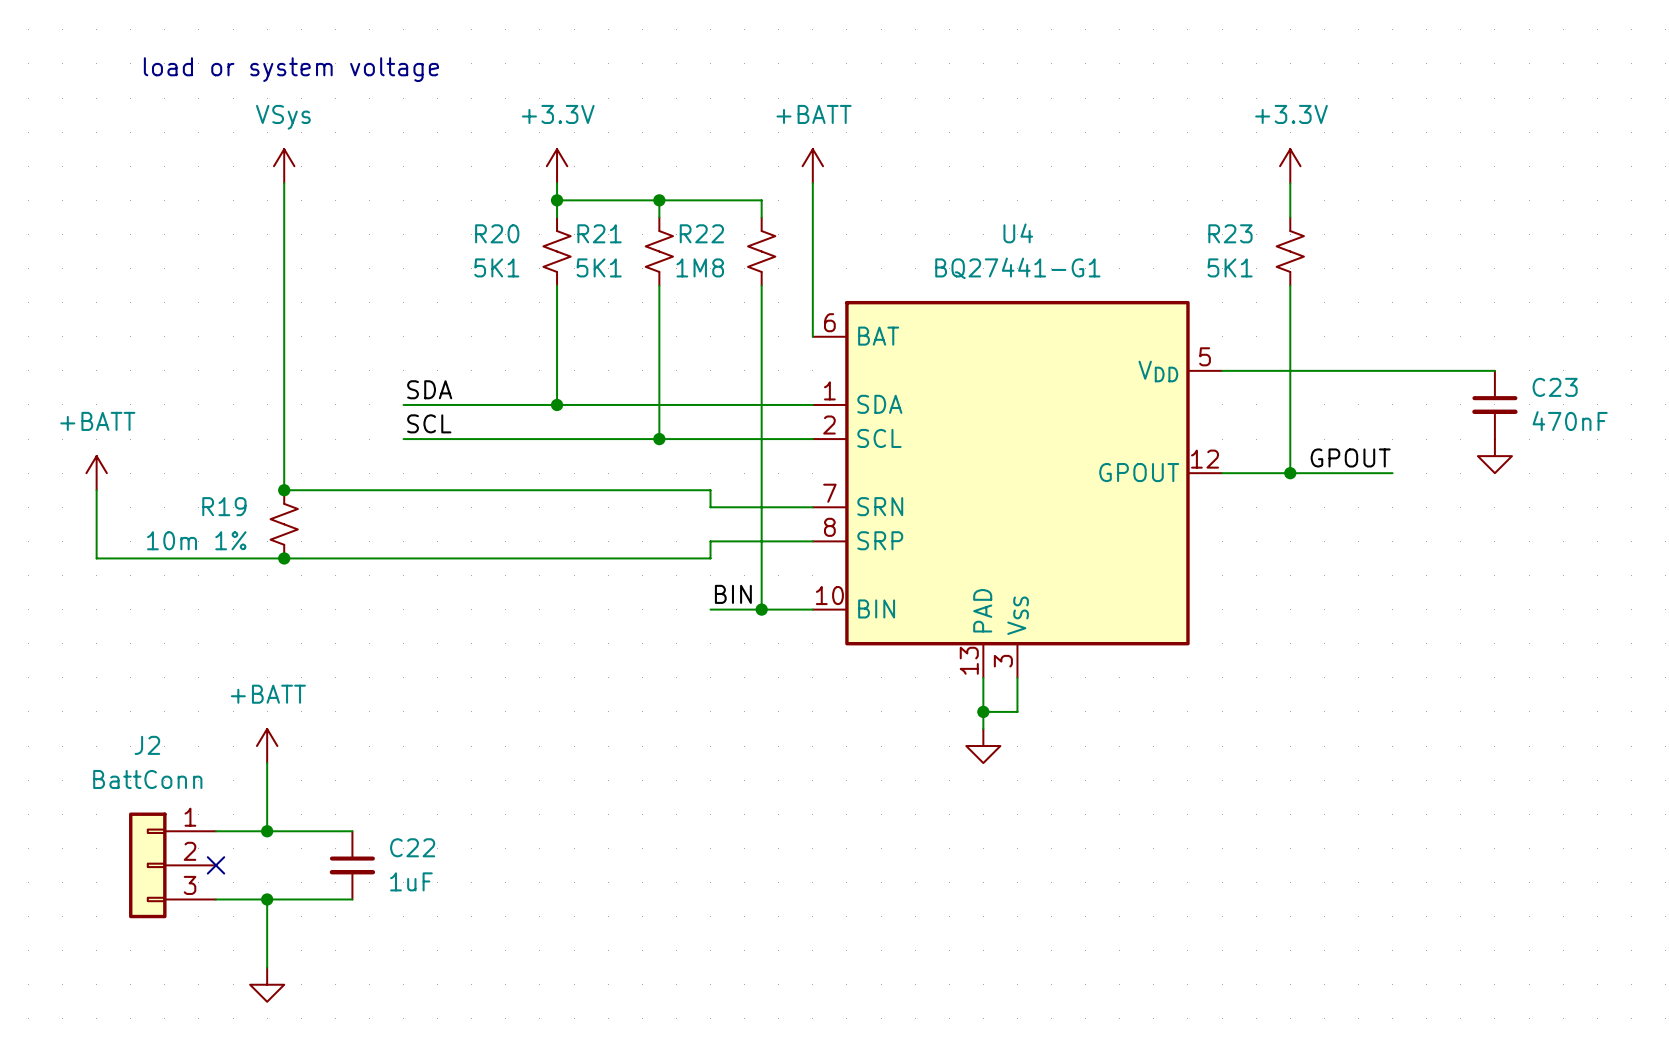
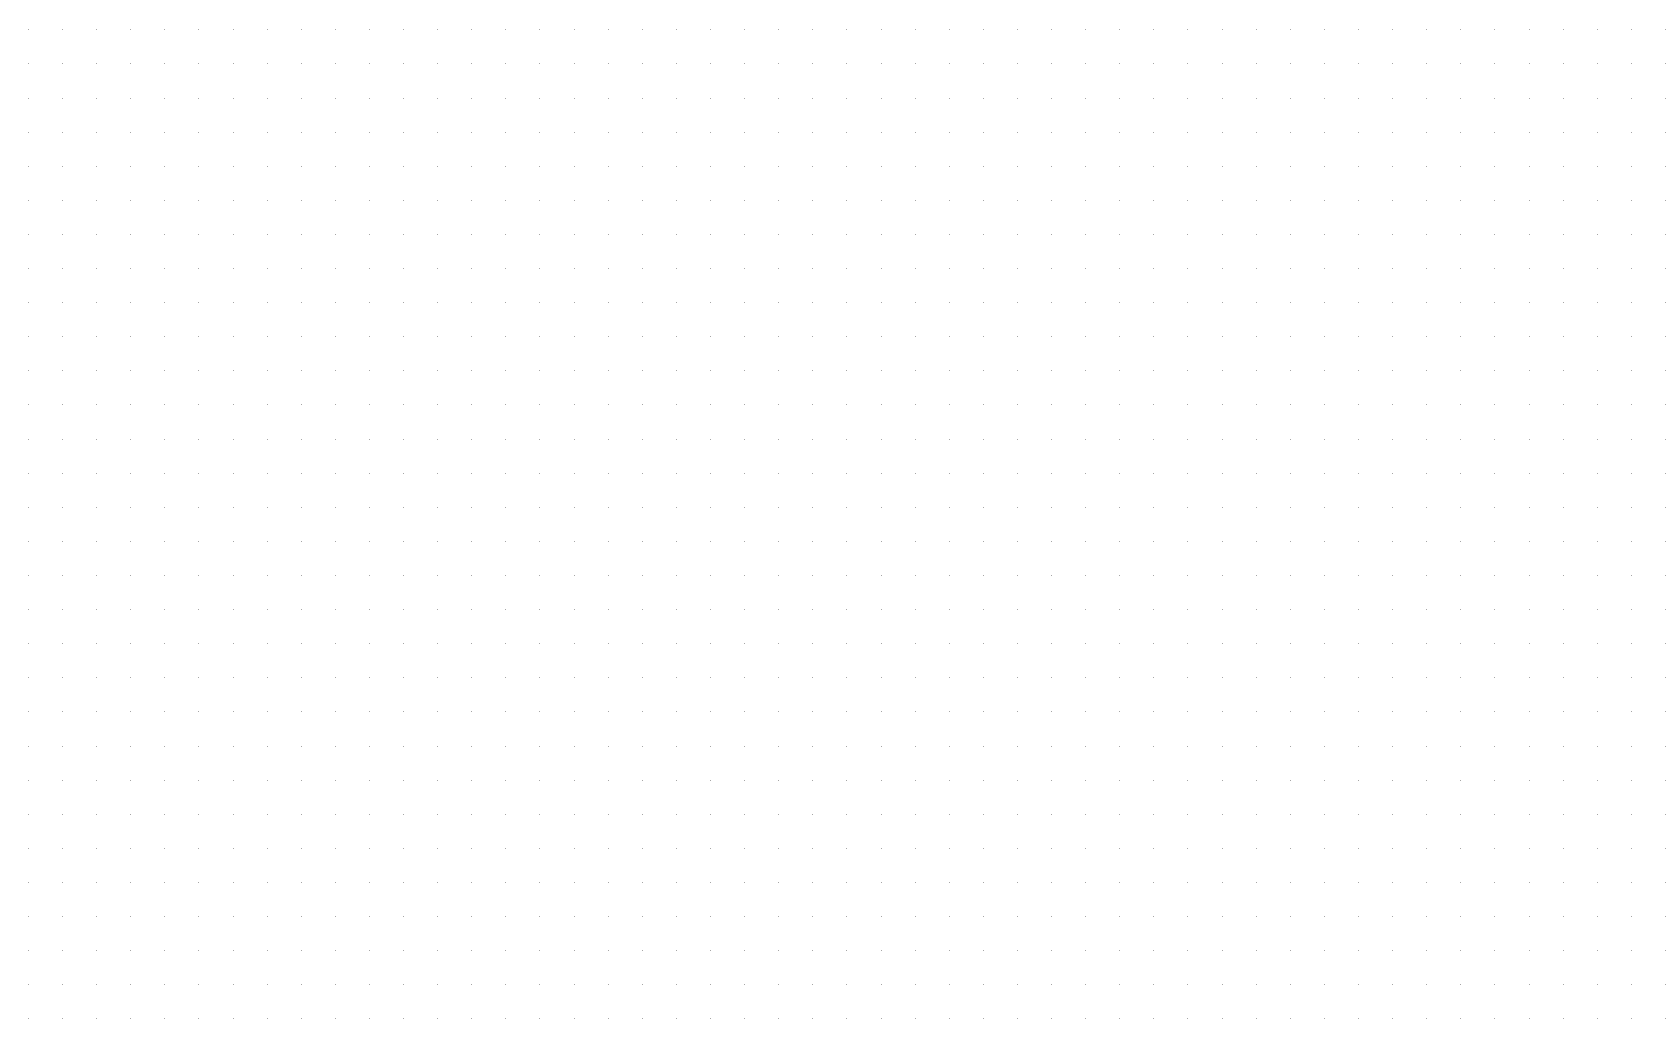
text: load or system voltage (291, 69) -> none
power symbol: VSys (284, 166) -> none
power symbol: +3.3V (557, 166) -> none
power symbol: +BATT (812, 166) -> none
power symbol: +3.3V (1290, 166) -> none
wire: (284, 183) (284, 490) (710, 490) (710, 507) (812, 507) -> none
wire: (557, 183) (557, 217) -> none
wire: (812, 183) (812, 336) -> none
wire: (1290, 183) (1290, 217) -> none
wire: (557, 200) (761, 200) (761, 217) -> none
junction: (557, 200) -> none
wire: (659, 200) (659, 217) -> none
junction: (659, 200) -> none
R20: 5K1 (557, 251) -> none
R21: 5K1 (659, 251) -> none
R22: 1M8 (761, 251) -> none
R23: 5K1 (1290, 251) -> none
wire: (557, 285) (557, 404) -> none
wire: (659, 285) (659, 439) -> none
wire: (761, 285) (761, 609) -> none
wire: (1290, 285) (1290, 473) -> none
wire: (1222, 370) (1494, 370) -> none
label: SDA (429, 389) -> none
wire: (403, 404) (812, 404) -> none
junction: (557, 404) -> none
C23: 470nF (1494, 404) -> none
label: SCL (429, 423) -> none
wire: (403, 439) (812, 439) -> none
junction: (659, 439) -> none
power symbol: (1494, 456) -> none
label: GPOUT (1350, 457) -> none
power symbol: +BATT (96, 473) -> none
wire: (1222, 473) (1392, 473) -> none
junction: (1290, 473) -> none
U4: BQ27441-G1 (1017, 489) -> none
wire: (96, 490) (96, 558) (710, 558) (710, 541) (812, 541) -> none
junction: (284, 490) -> none
R19: 10m 1% (284, 524) -> none
junction: (284, 558) -> none
label: BIN (733, 594) -> none
wire: (710, 609) (812, 609) -> none
junction: (761, 609) -> none
wire: (983, 677) (983, 728) -> none
wire: (1017, 677) (1017, 711) (983, 711) -> none
junction: (983, 711) -> none
power symbol: +BATT (267, 746) -> none
power symbol: (983, 746) -> none
wire: (267, 763) (267, 831) -> none
wire: (216, 831) (352, 831) -> none
junction: (267, 831) -> none
J2: BattConn (172, 865) -> none
no-connect mark: (216, 865) -> none
C22: 1uF (352, 865) -> none
wire: (216, 899) (352, 899) -> none
wire: (267, 899) (267, 967) -> none
junction: (267, 899) -> none
power symbol: (267, 984) -> none

